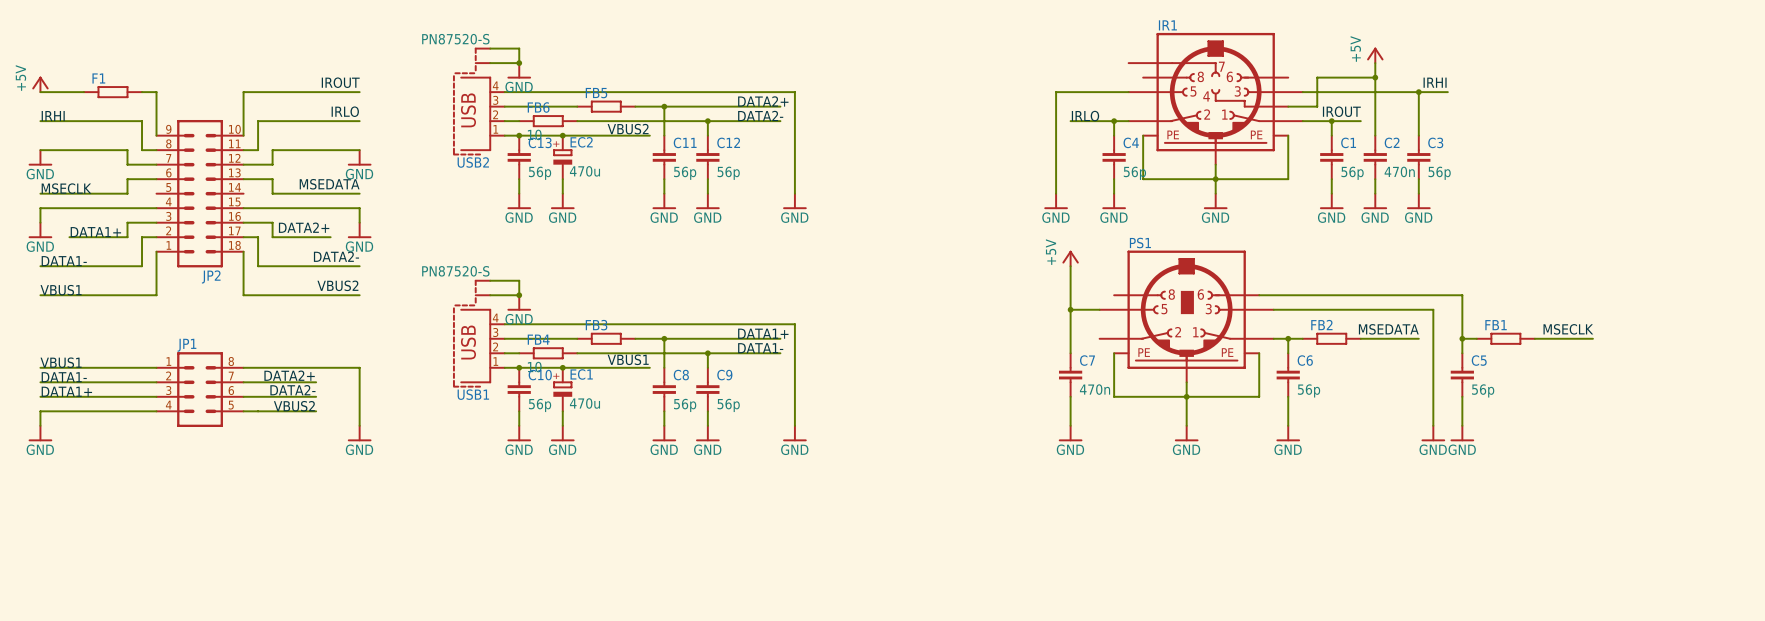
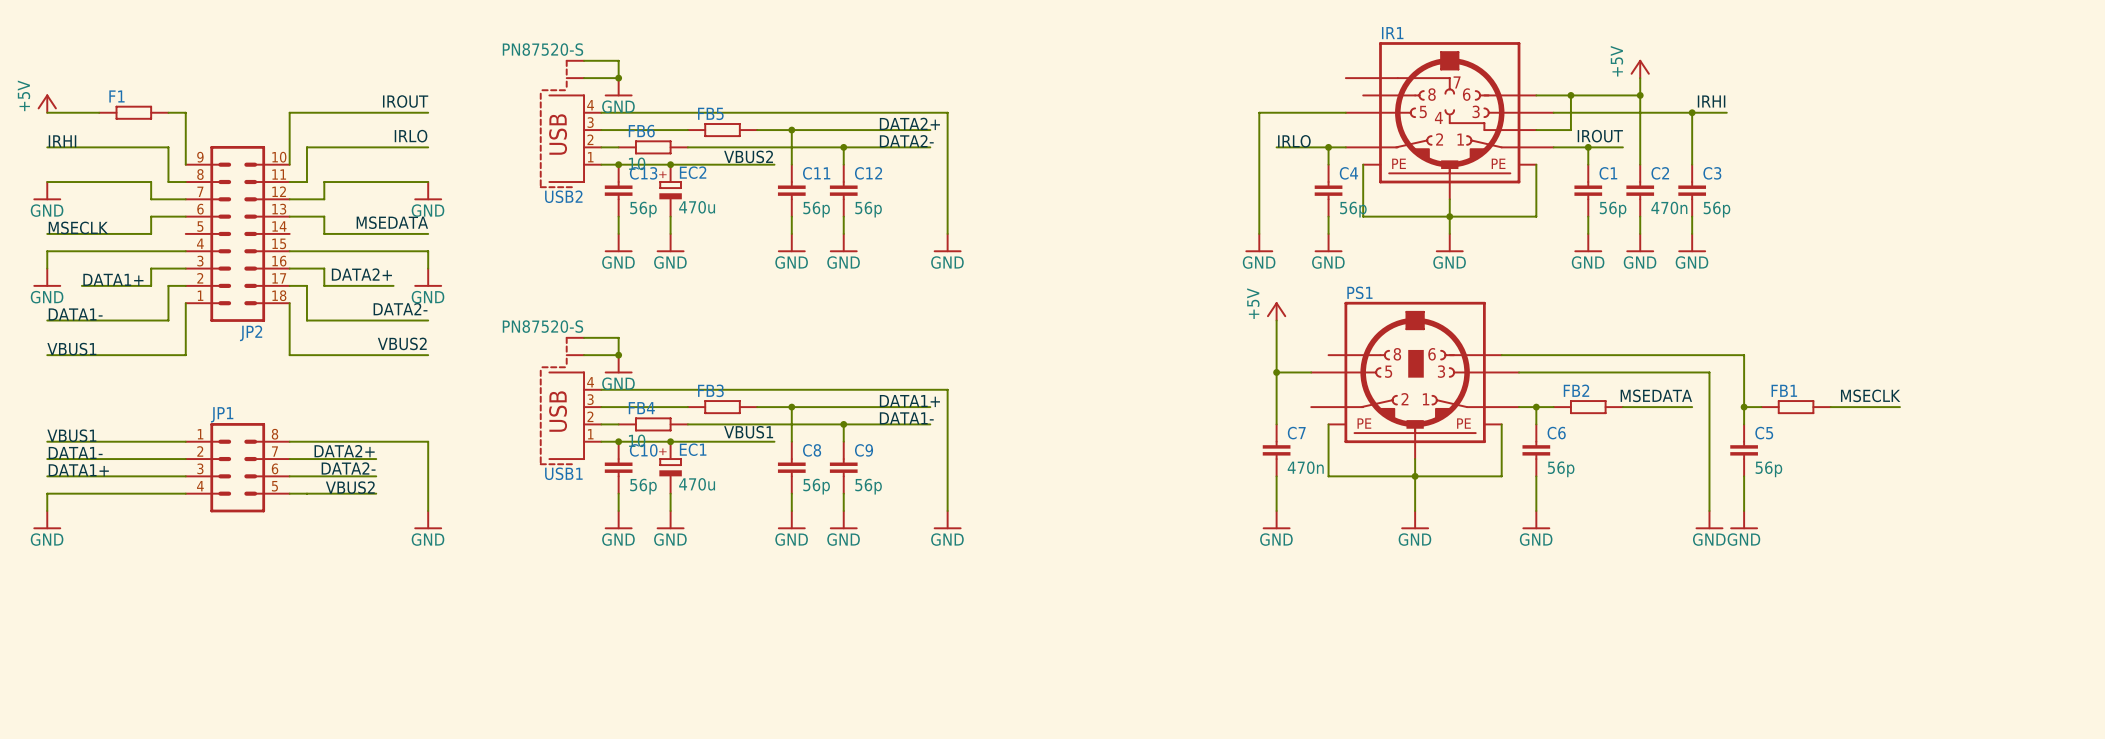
wire: none -> (1536, 95) (1570, 95)
junction: none -> (1570, 95)

